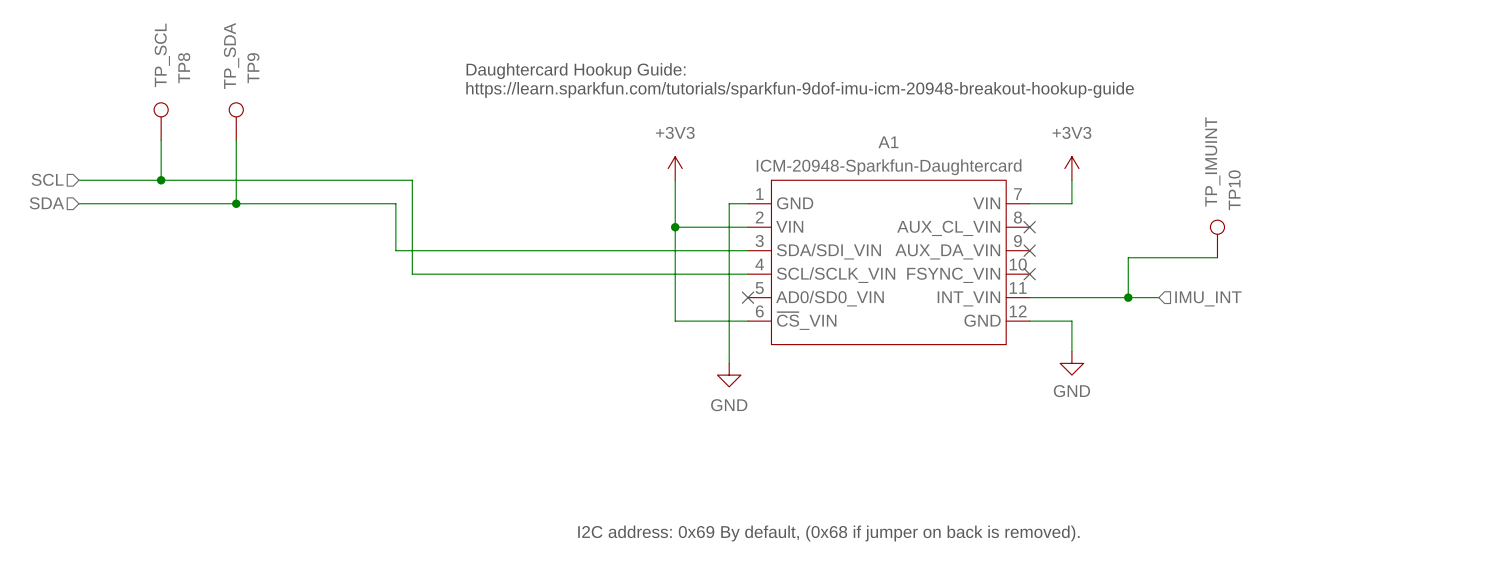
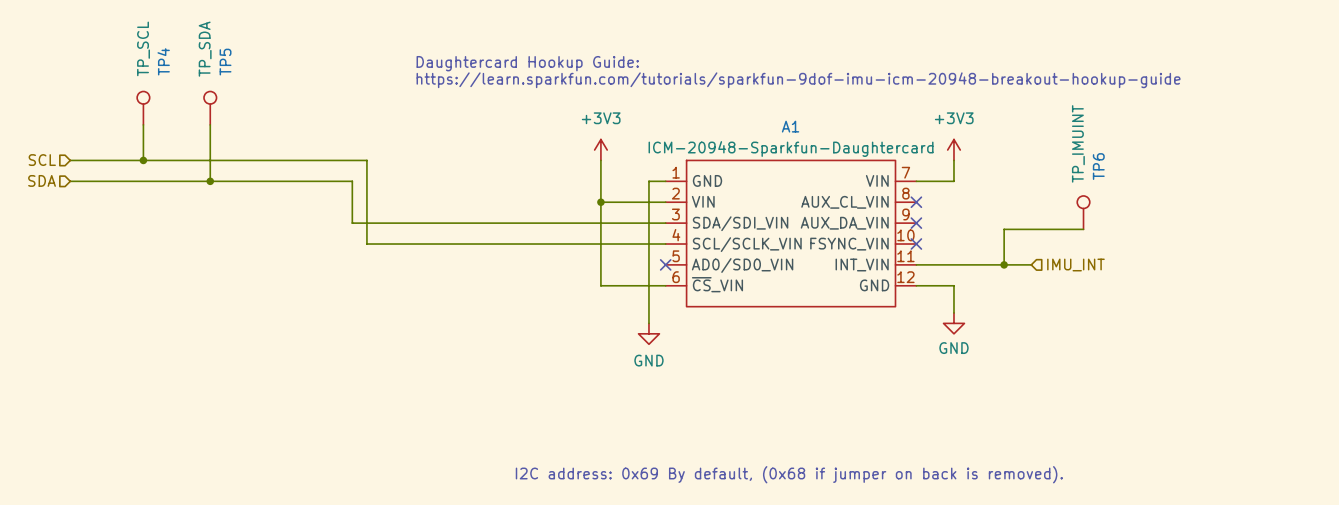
TP8 name: TP8 (184, 68) -> TP4 (163, 61)
TP9 name: TP9 (253, 68) -> TP5 (225, 62)
TP10 name: TP10 (1234, 190) -> TP6 (1098, 166)

